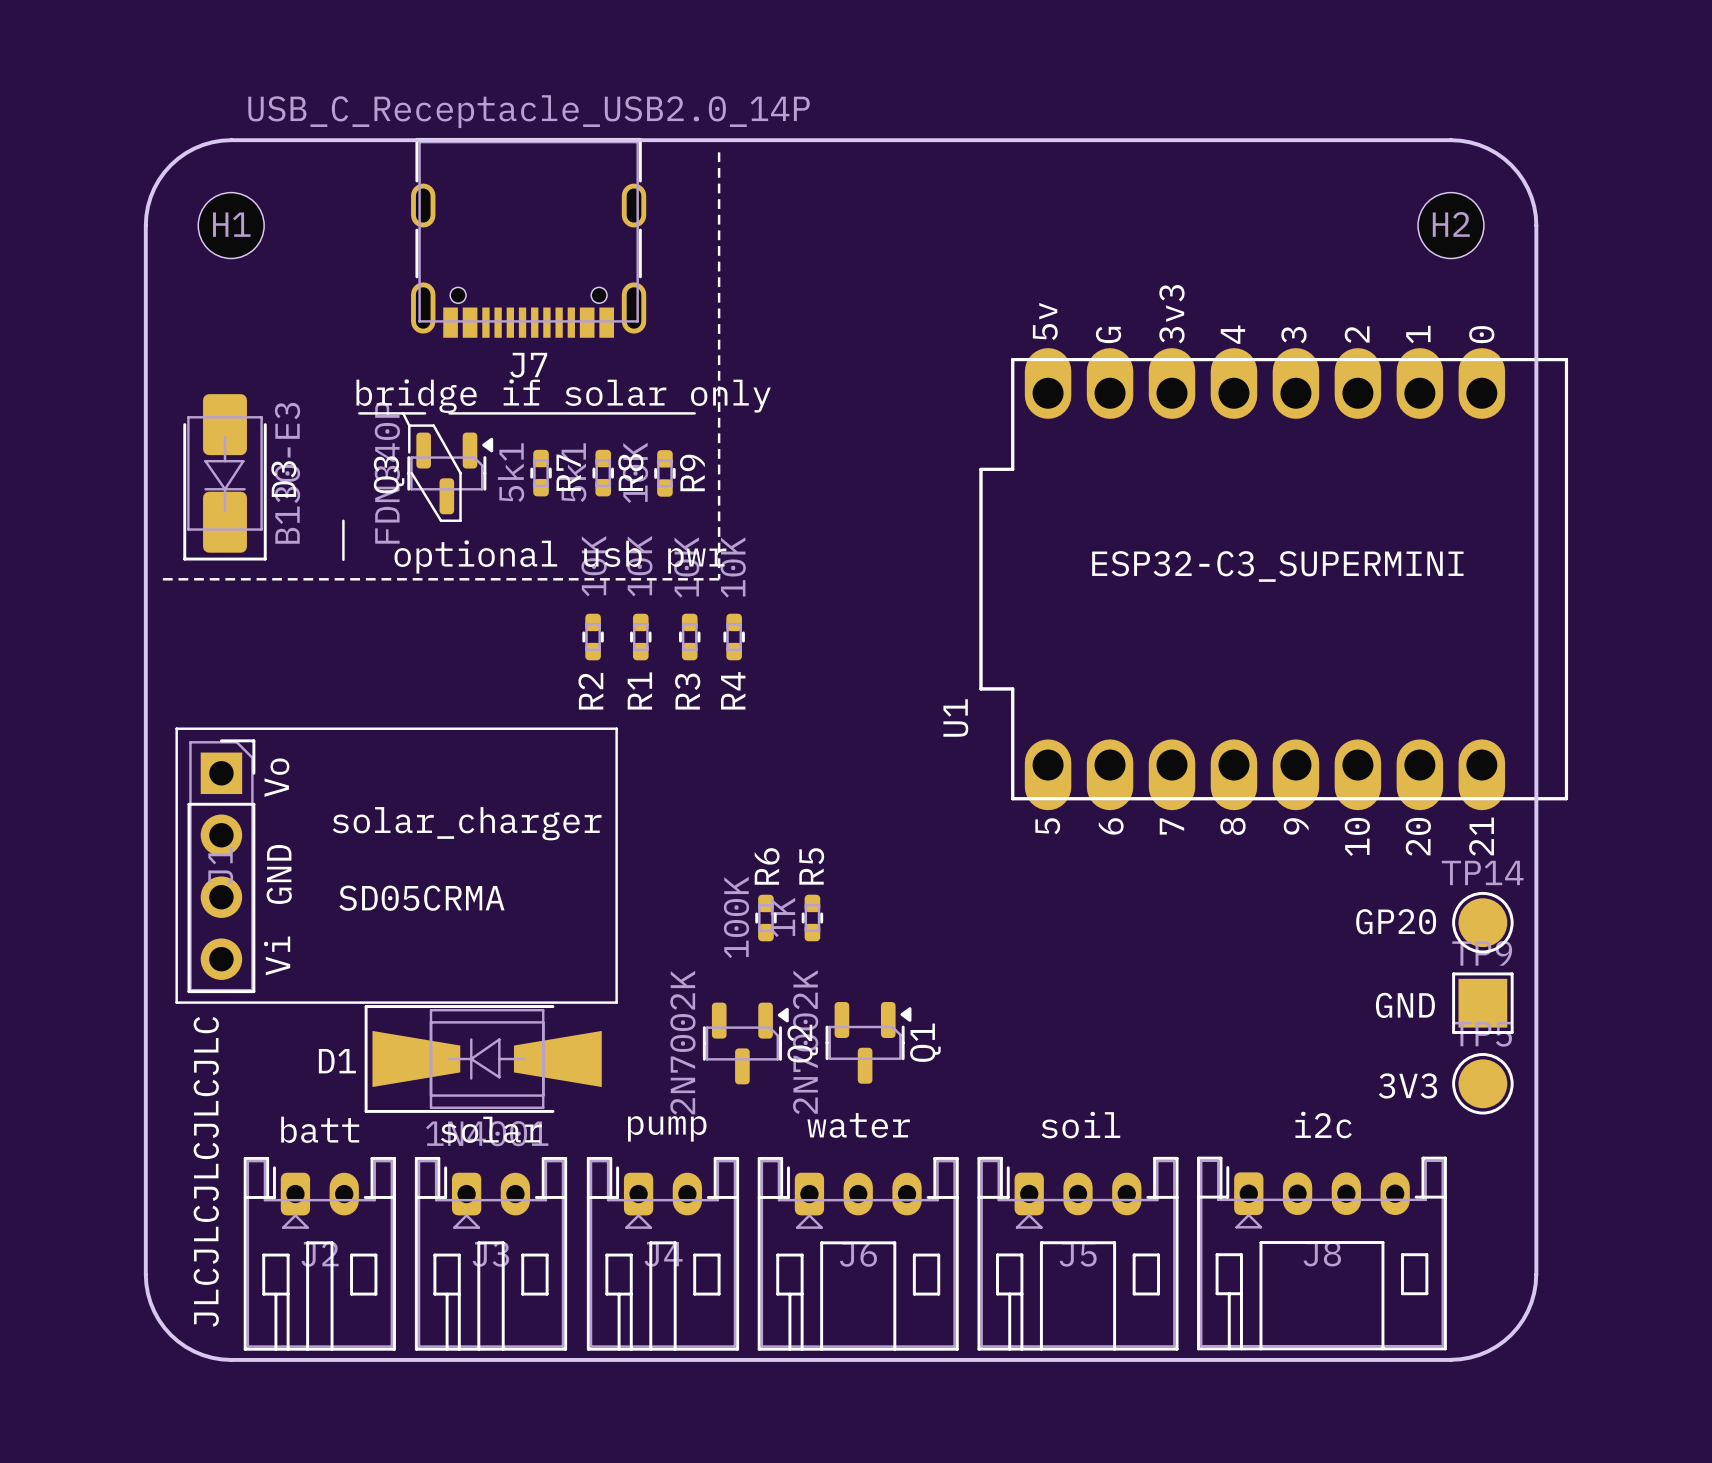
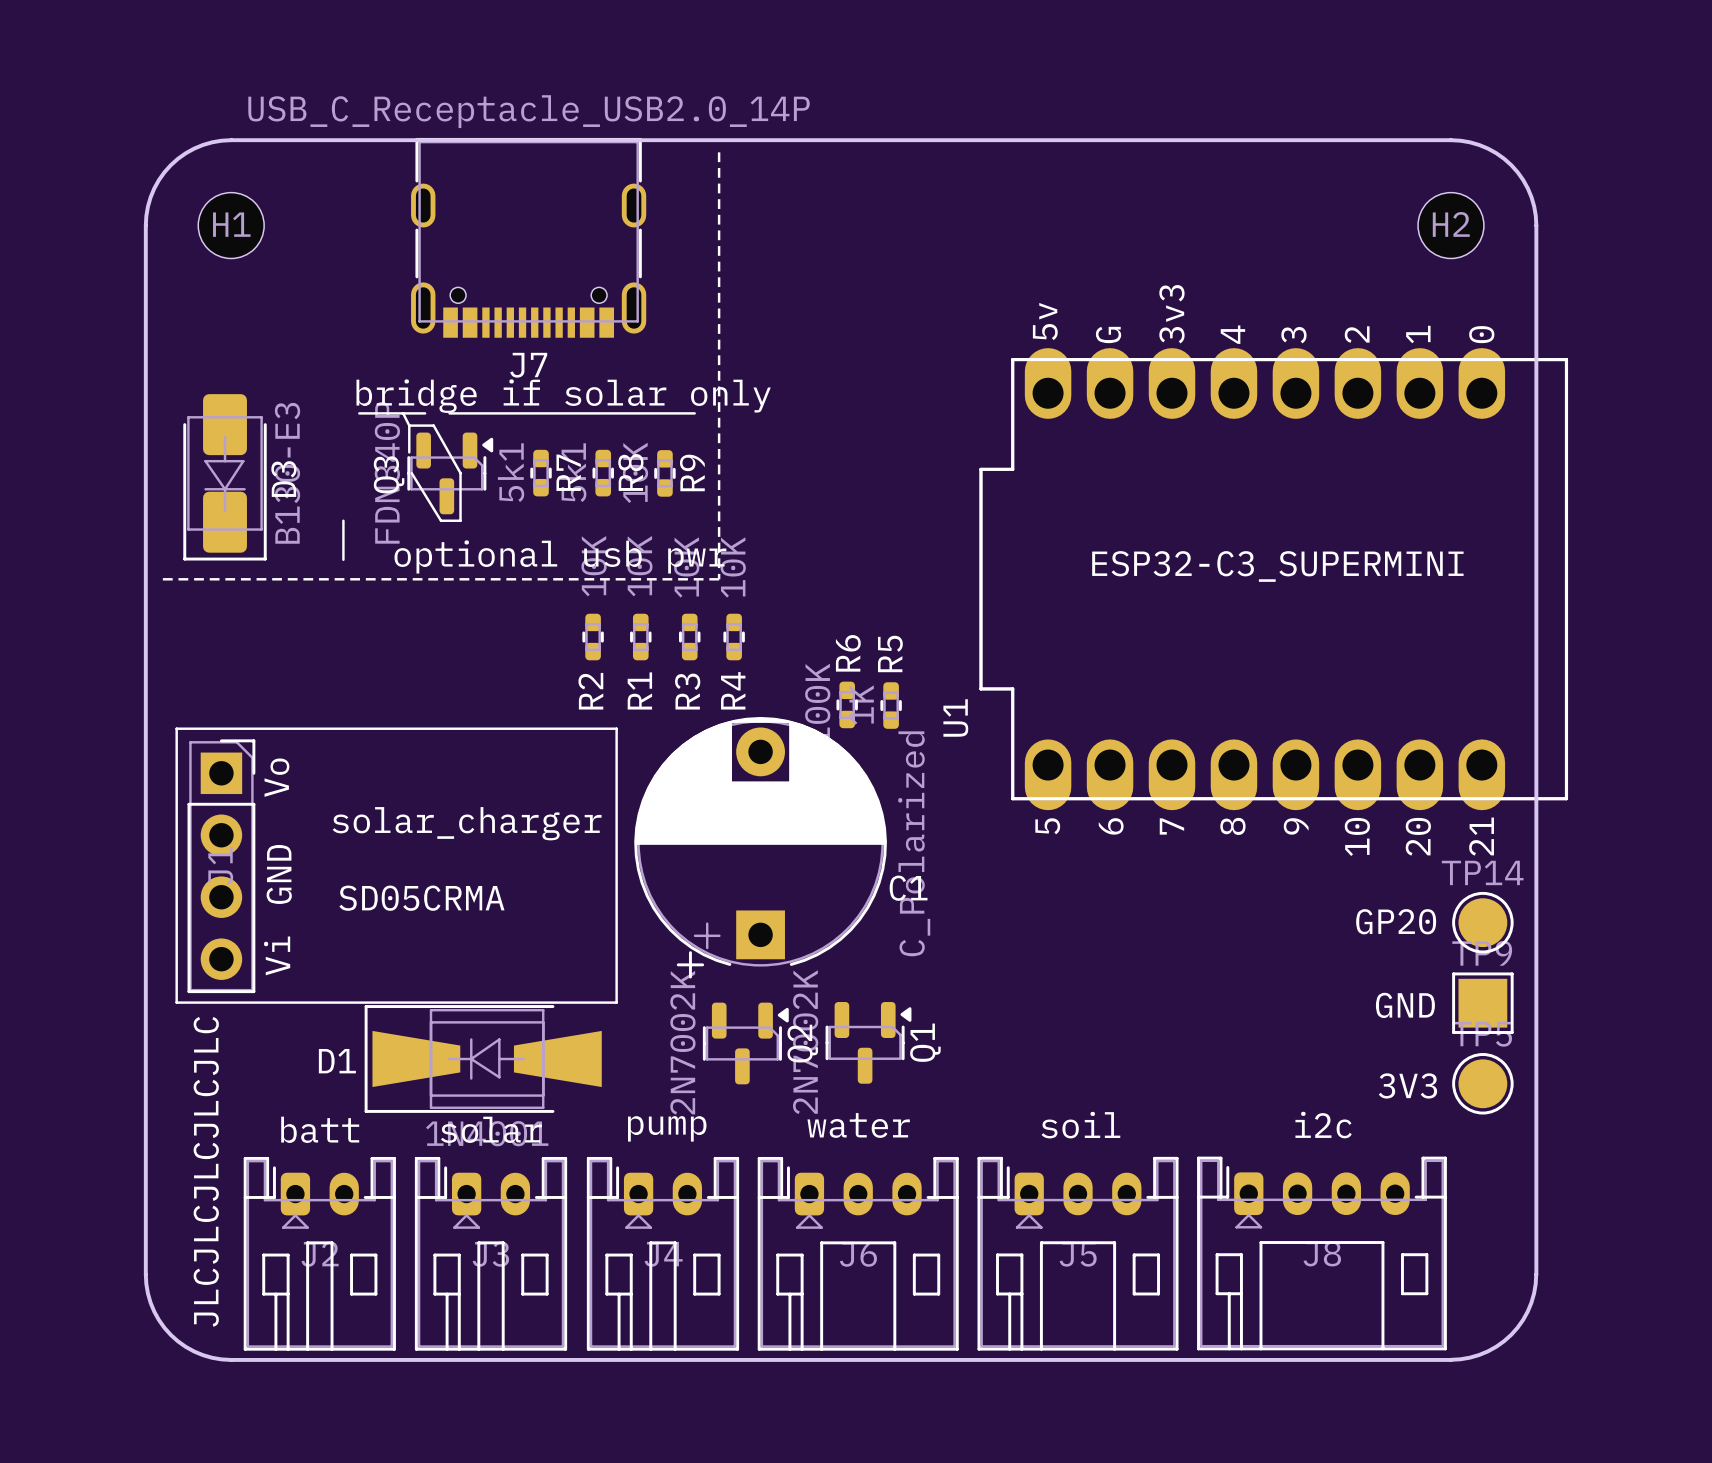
C1: none -> C_Polarized (760, 847)
R6 position: (765, 918) -> (847, 704)
R5 position: (812, 918) -> (891, 705)

